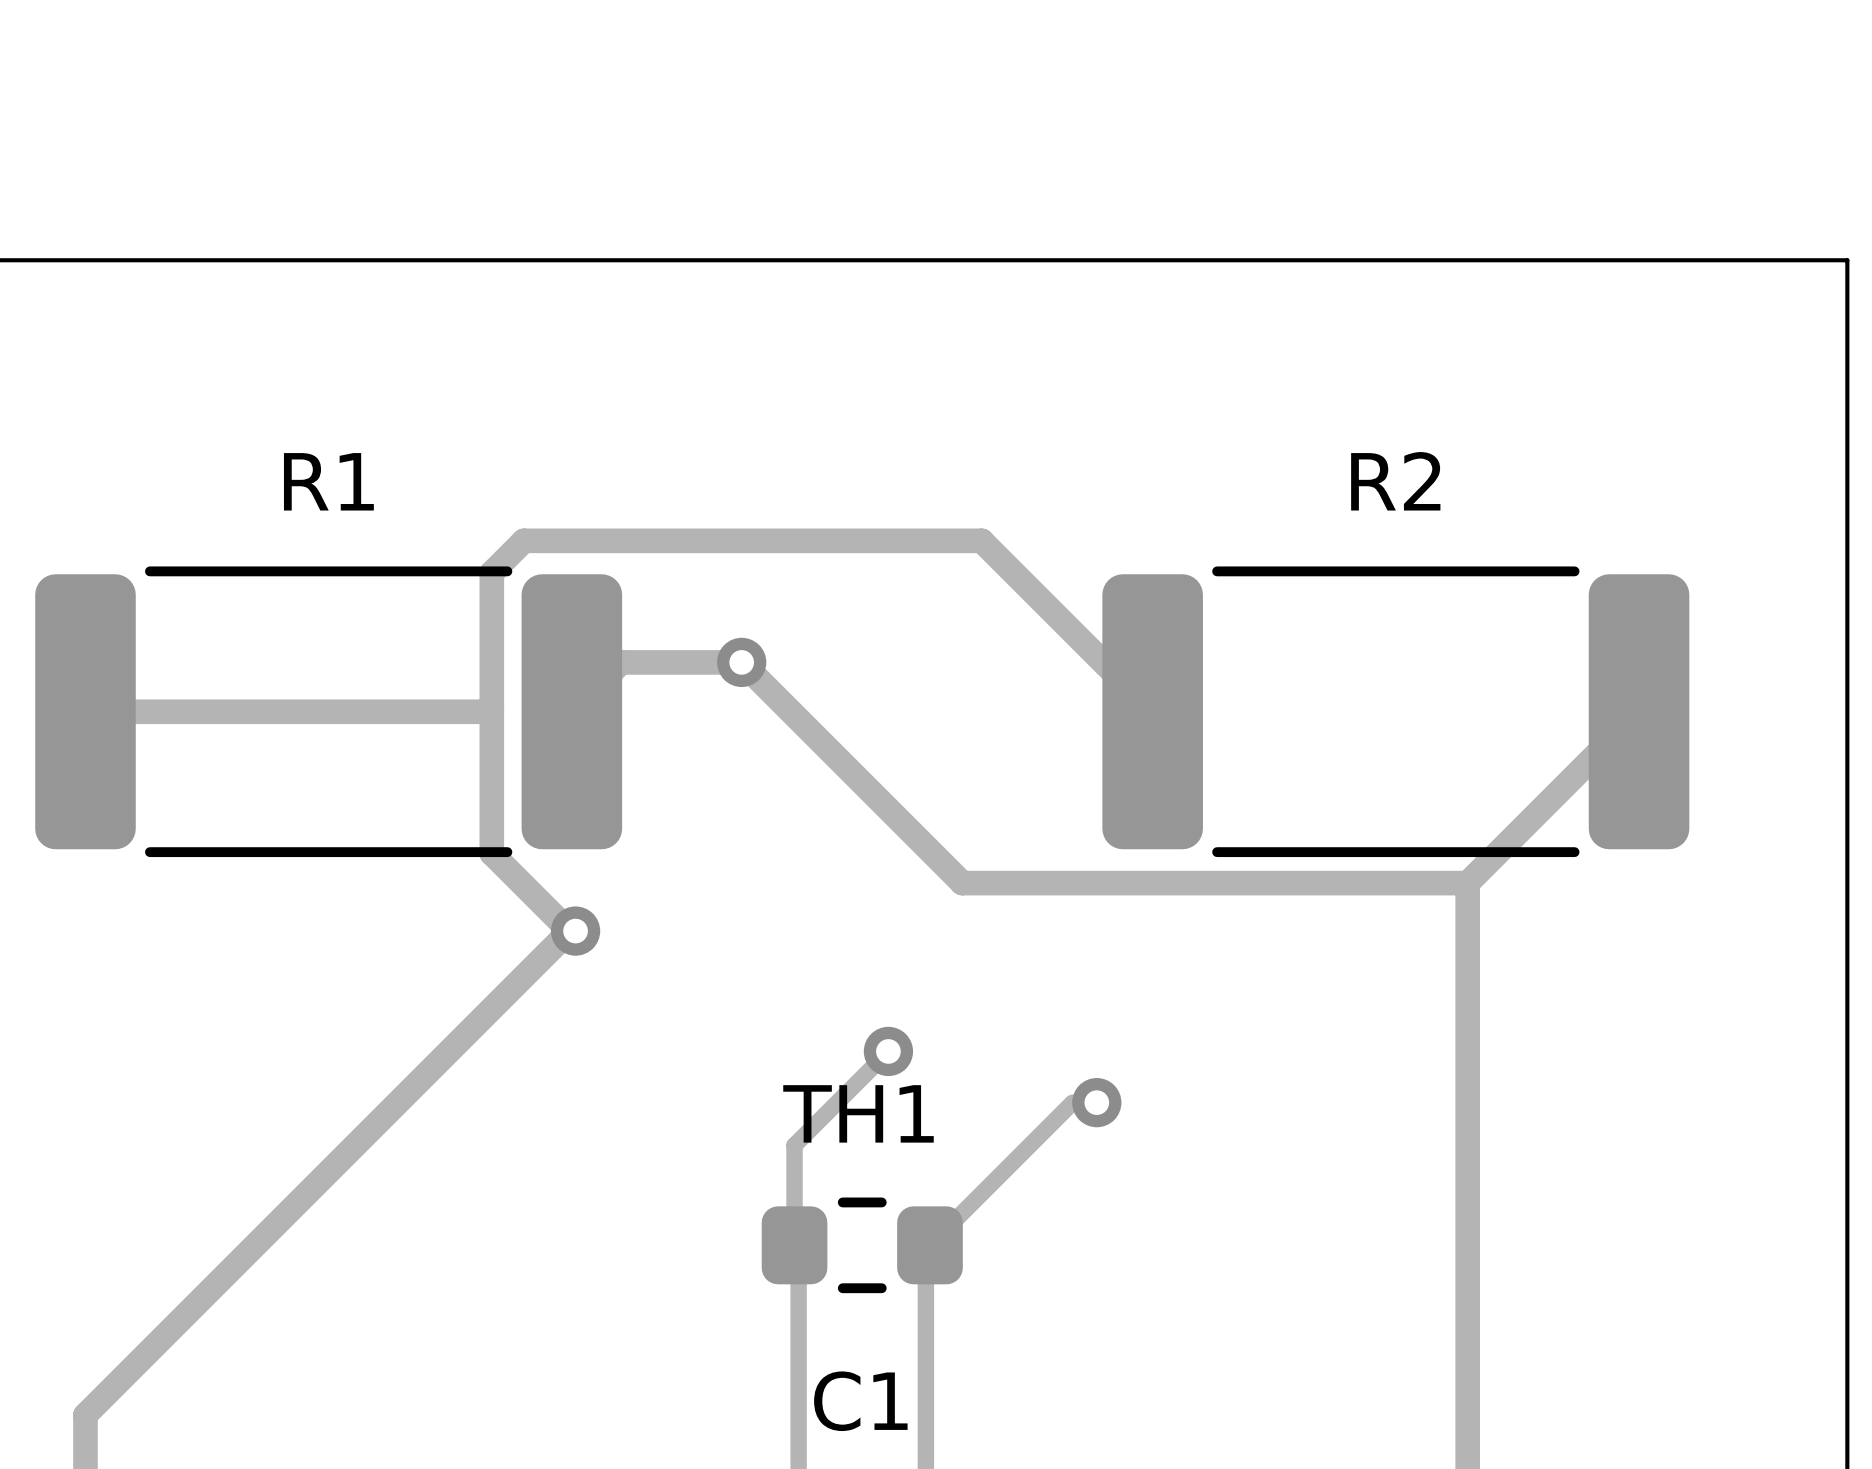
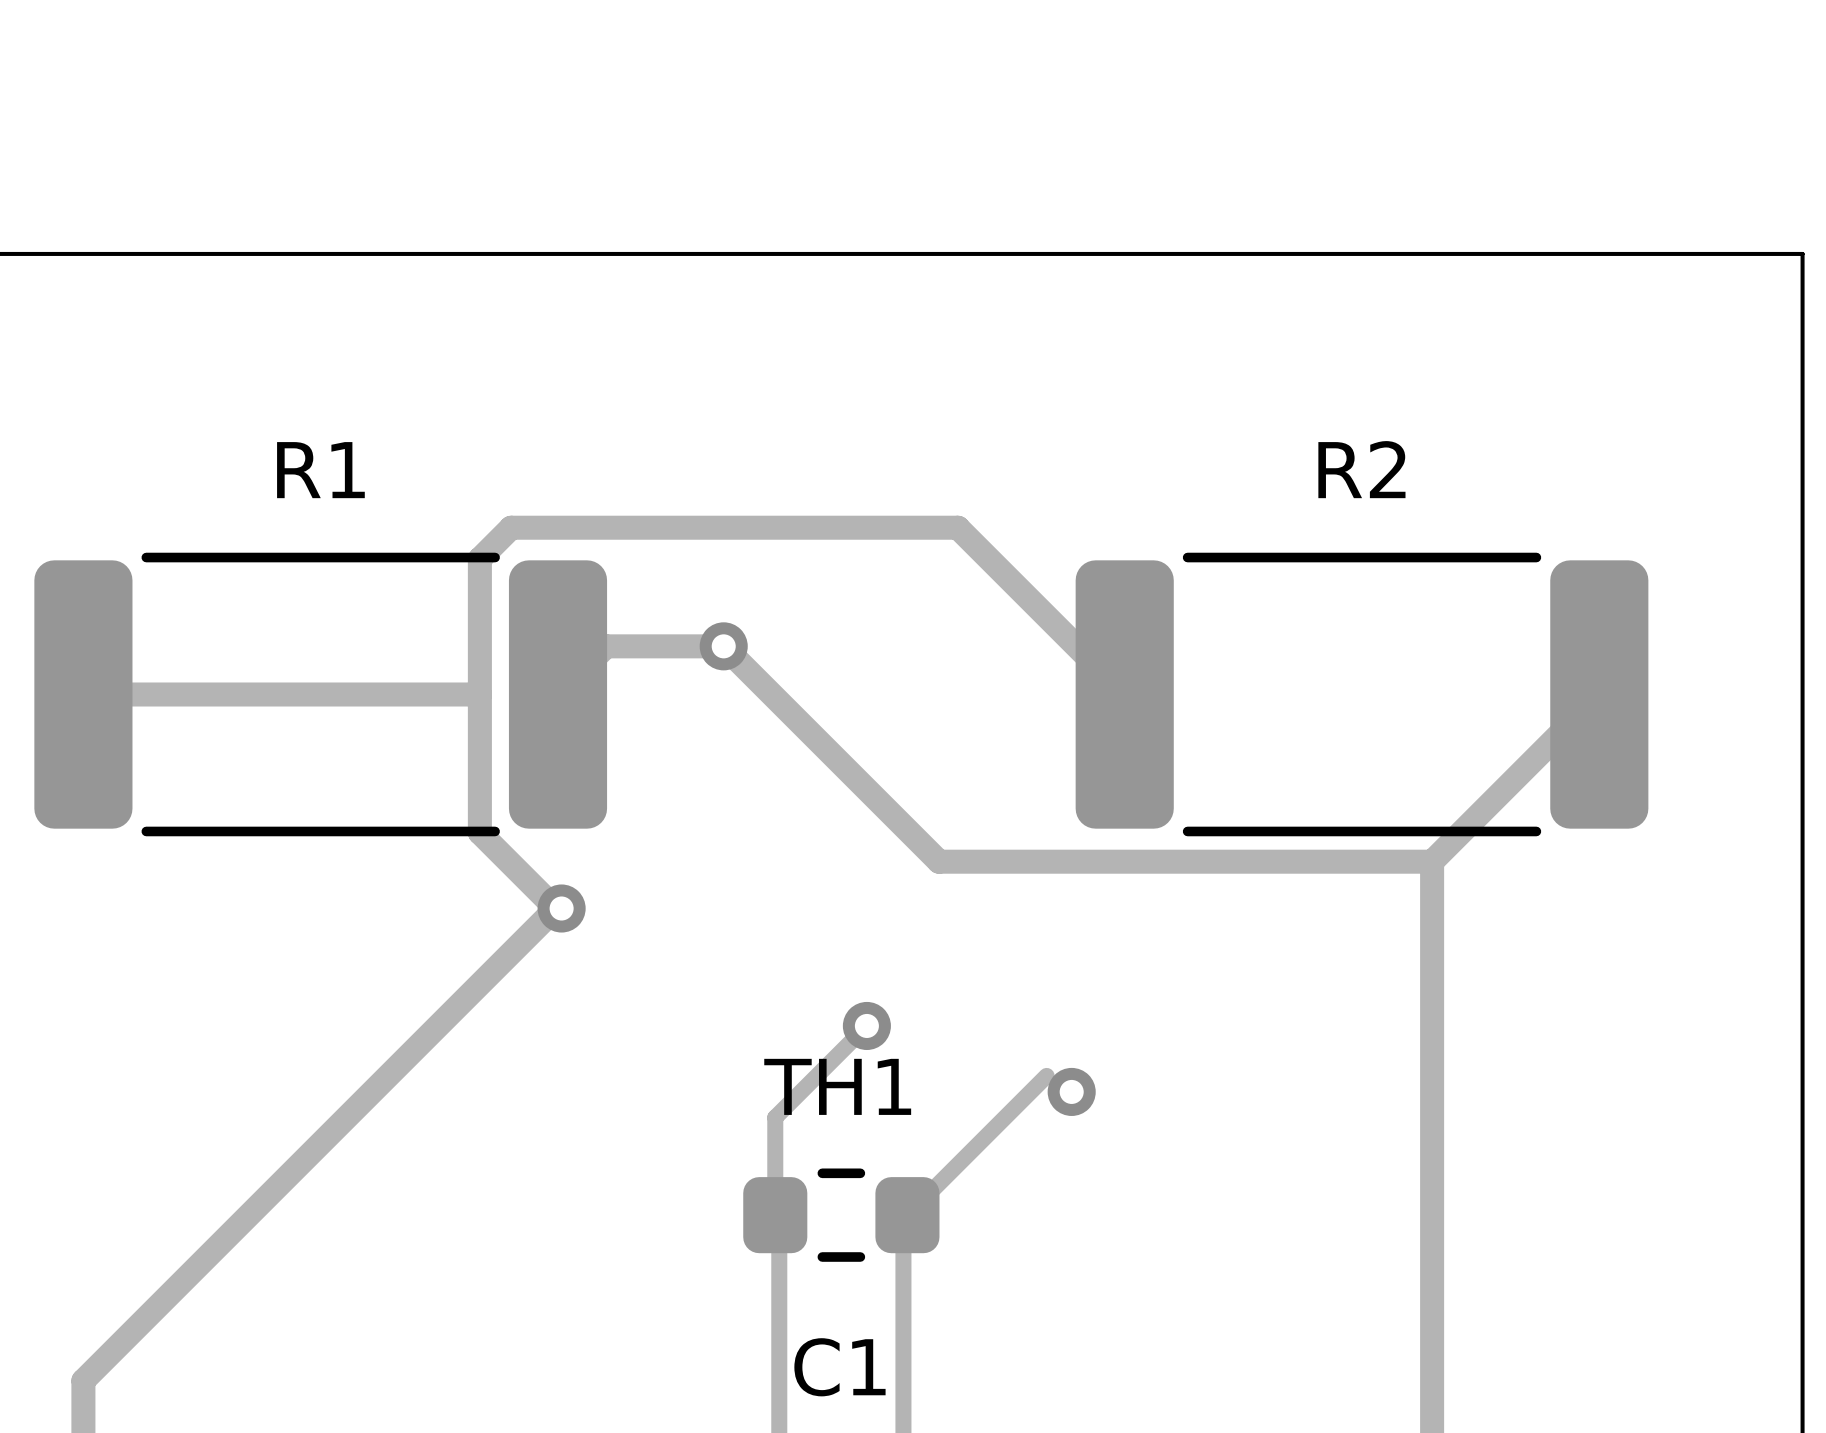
via position: (1096, 1102) -> (1071, 1091)

